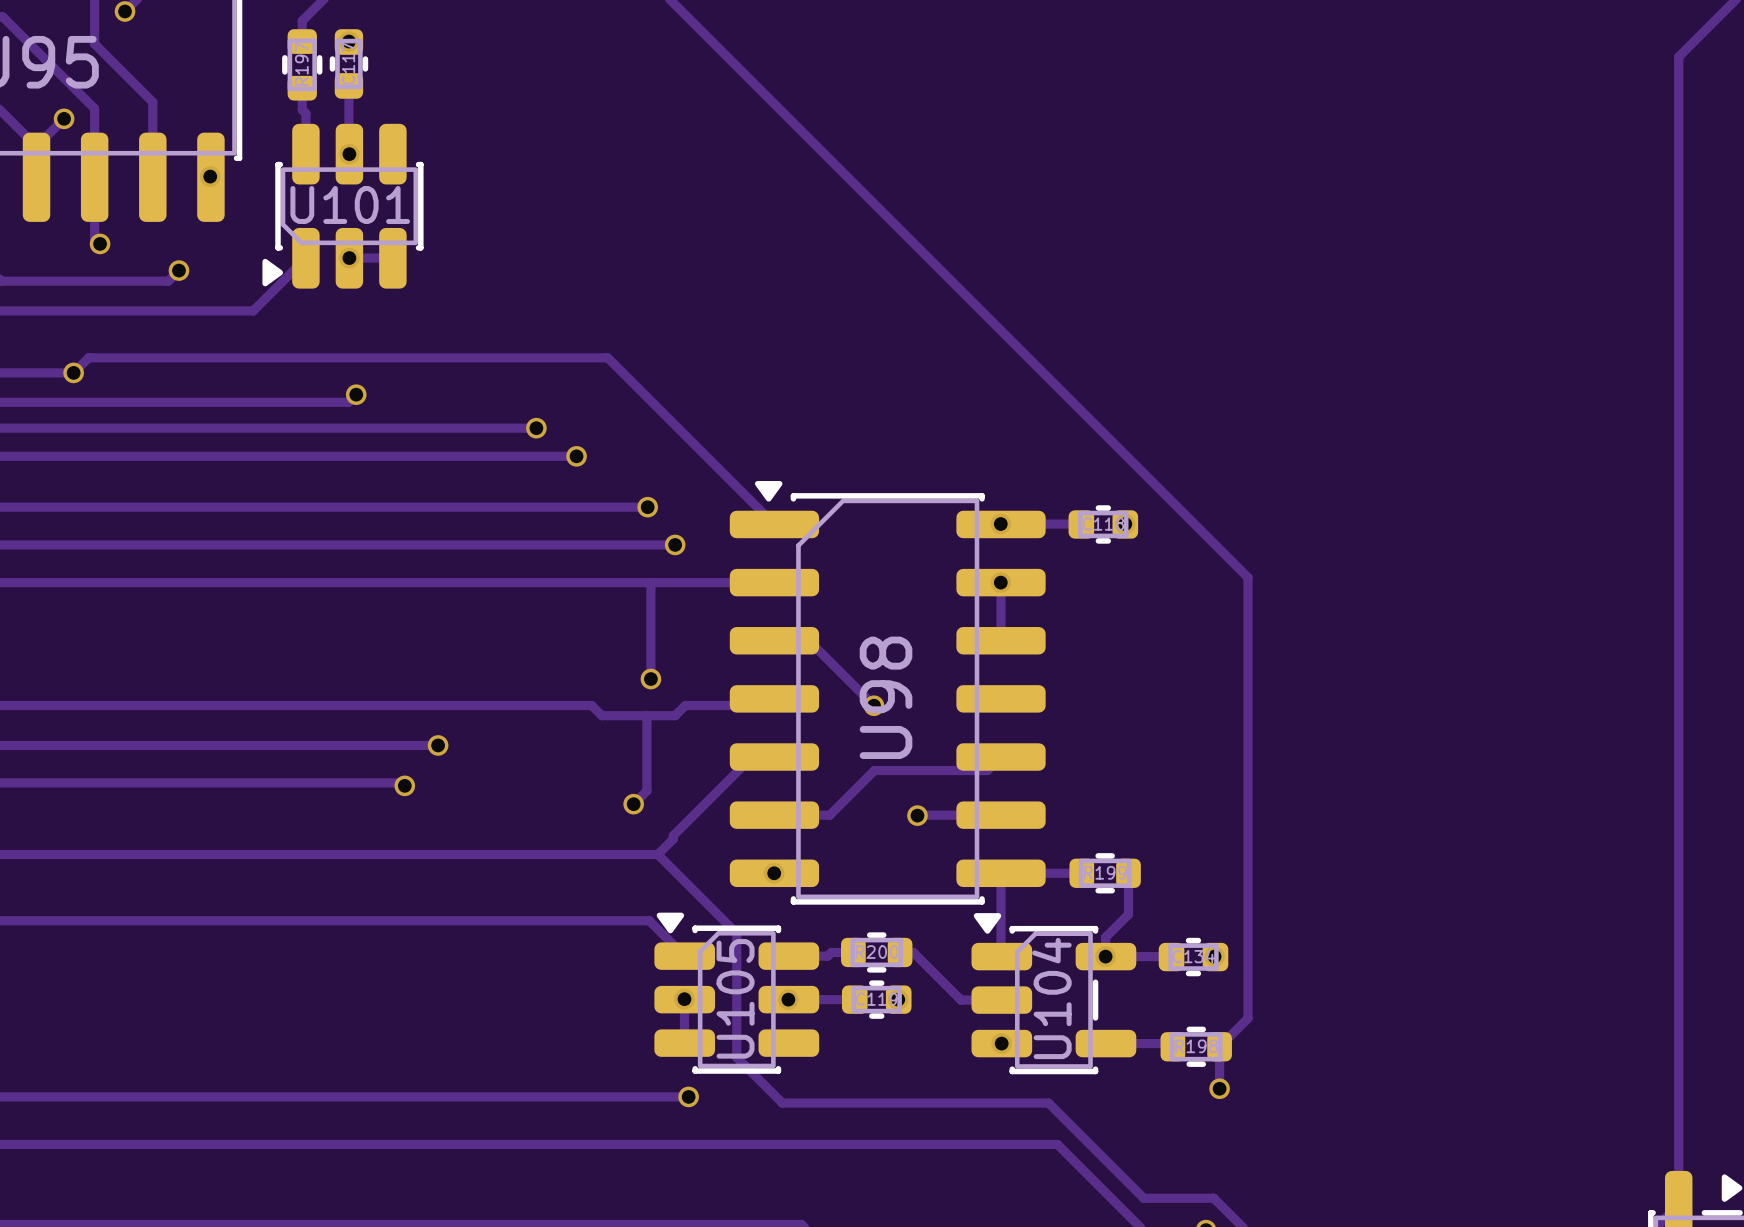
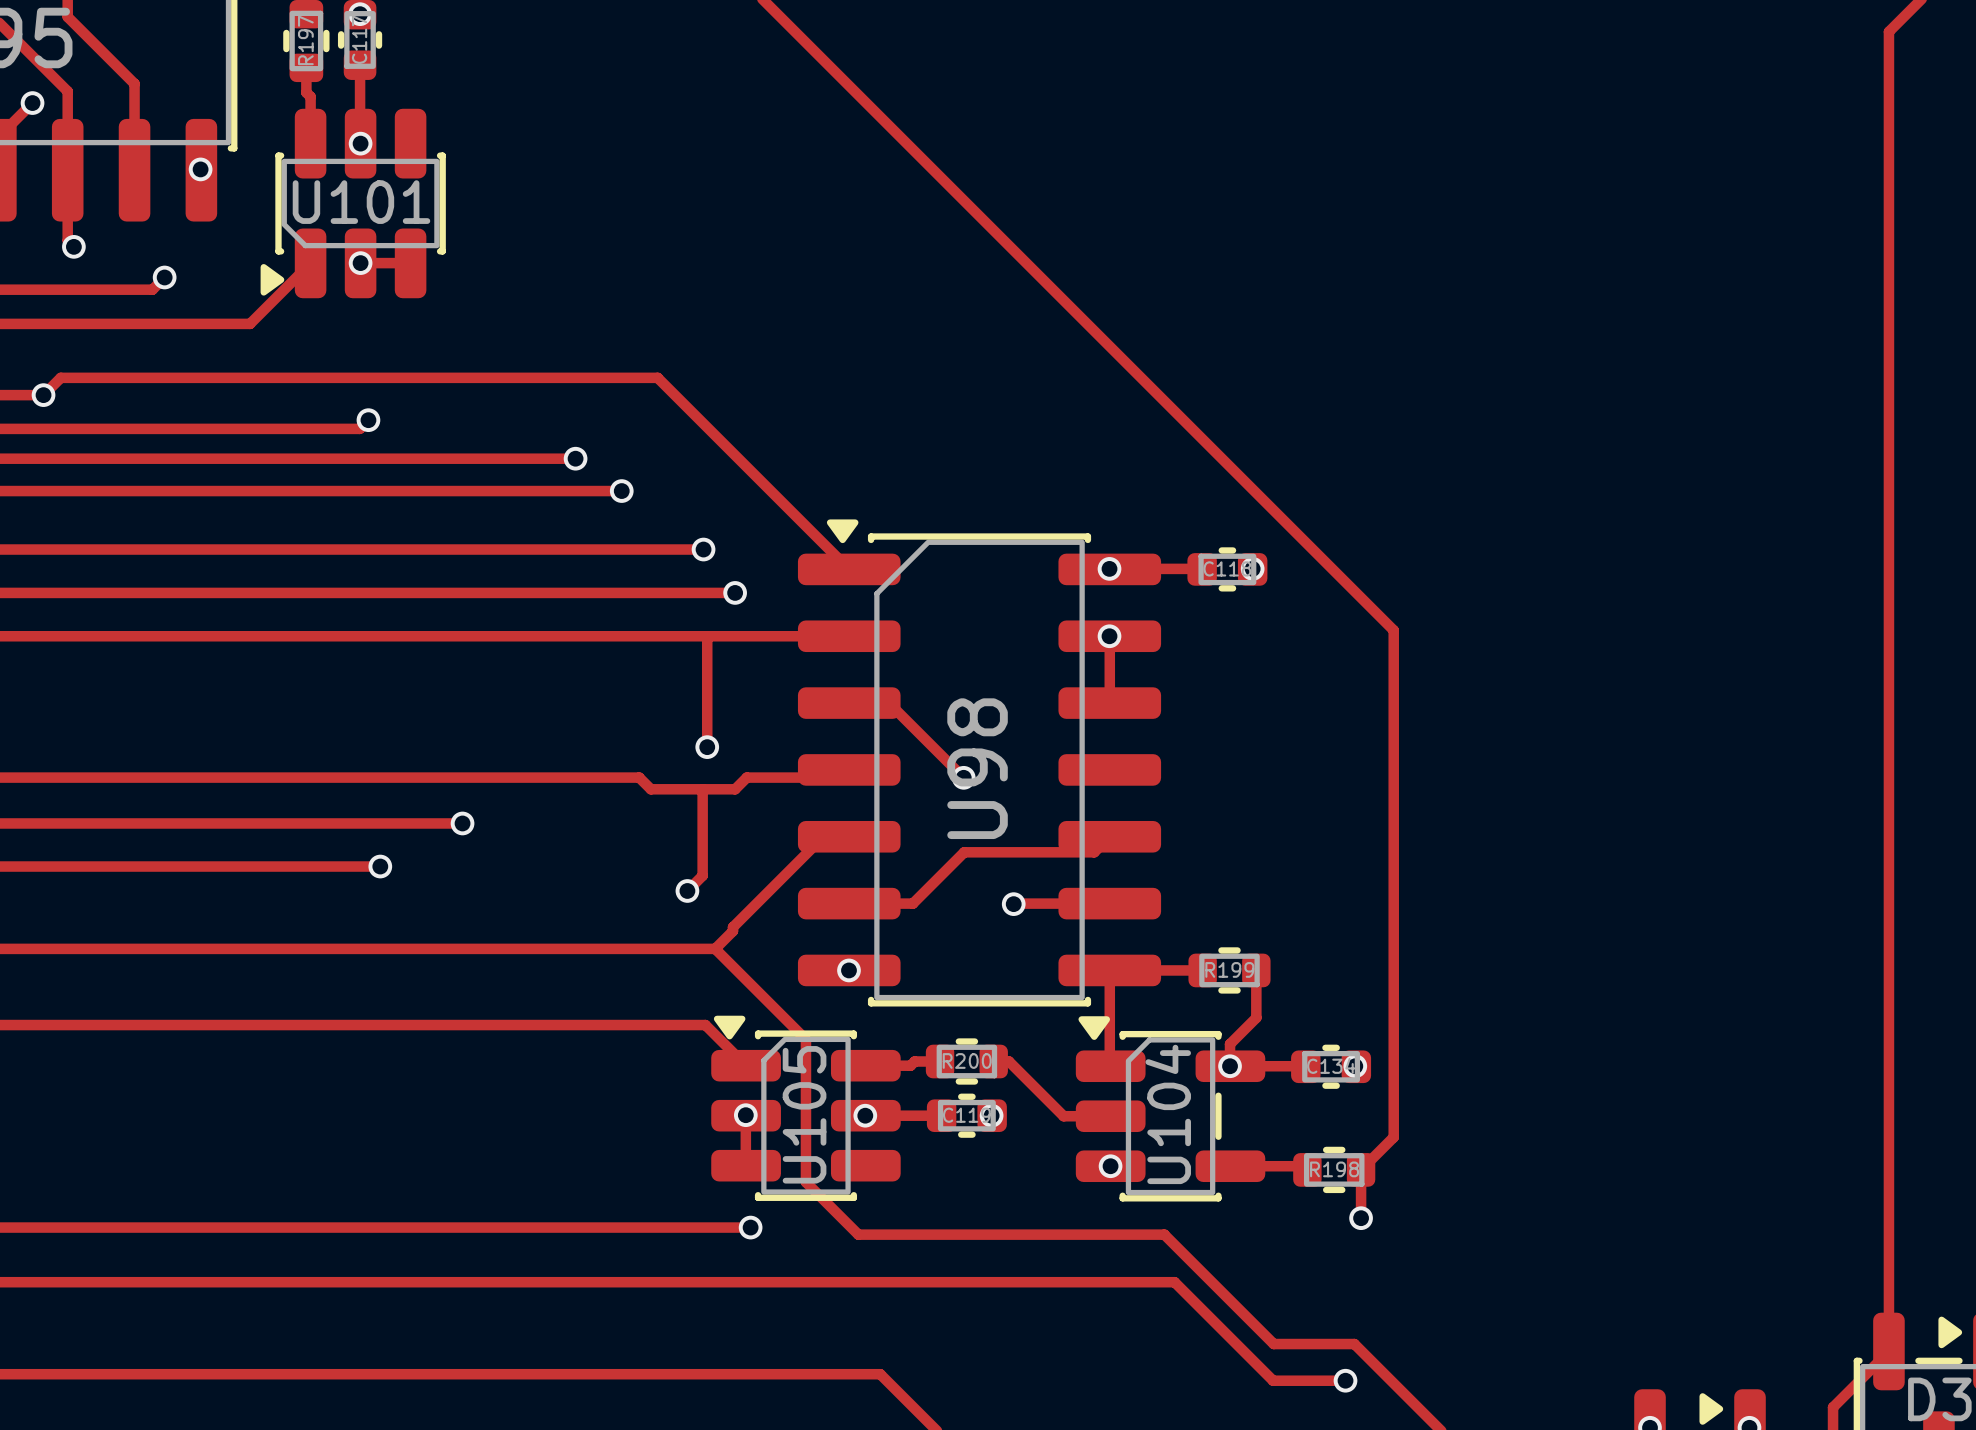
track: (366, 782) (401, 782) (404, 785) -> none
via position: (404, 785) -> (380, 866)

